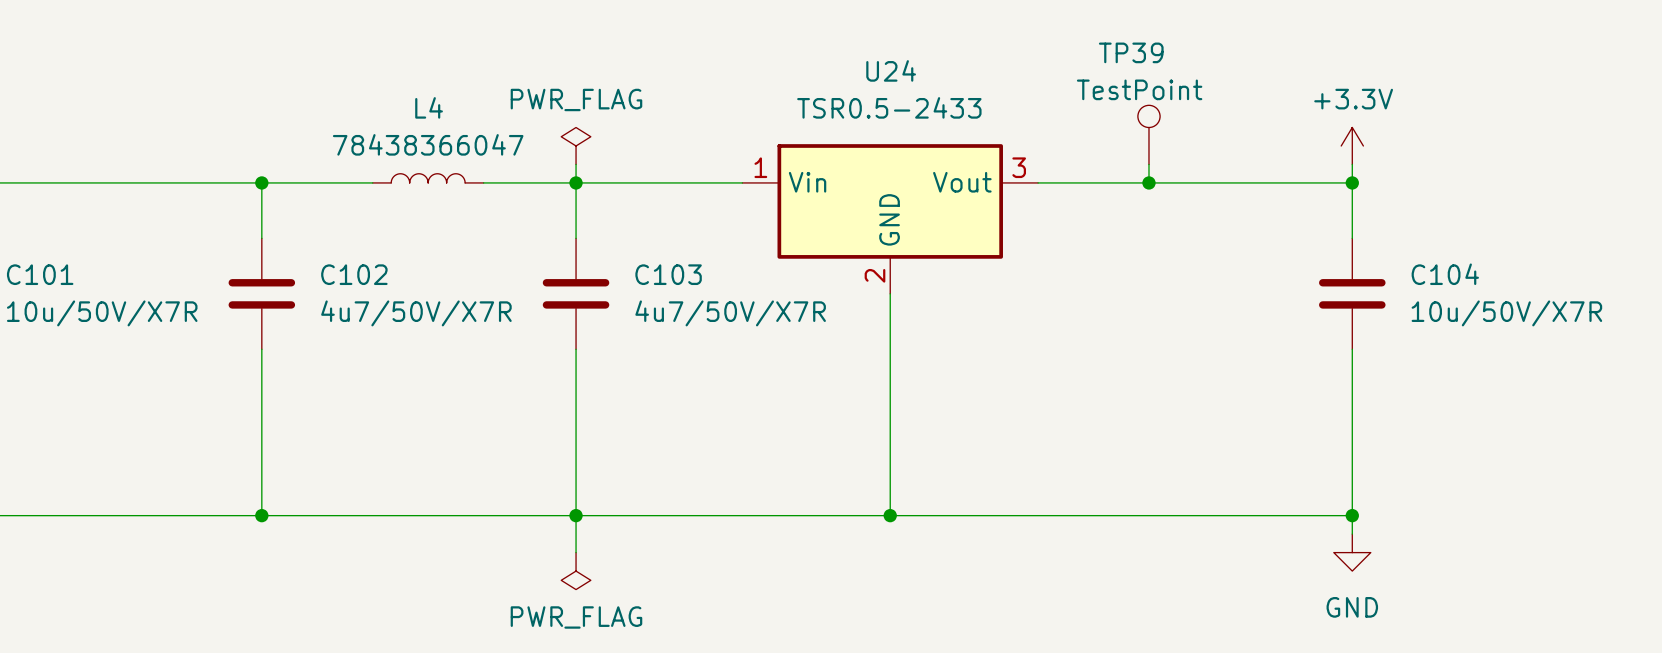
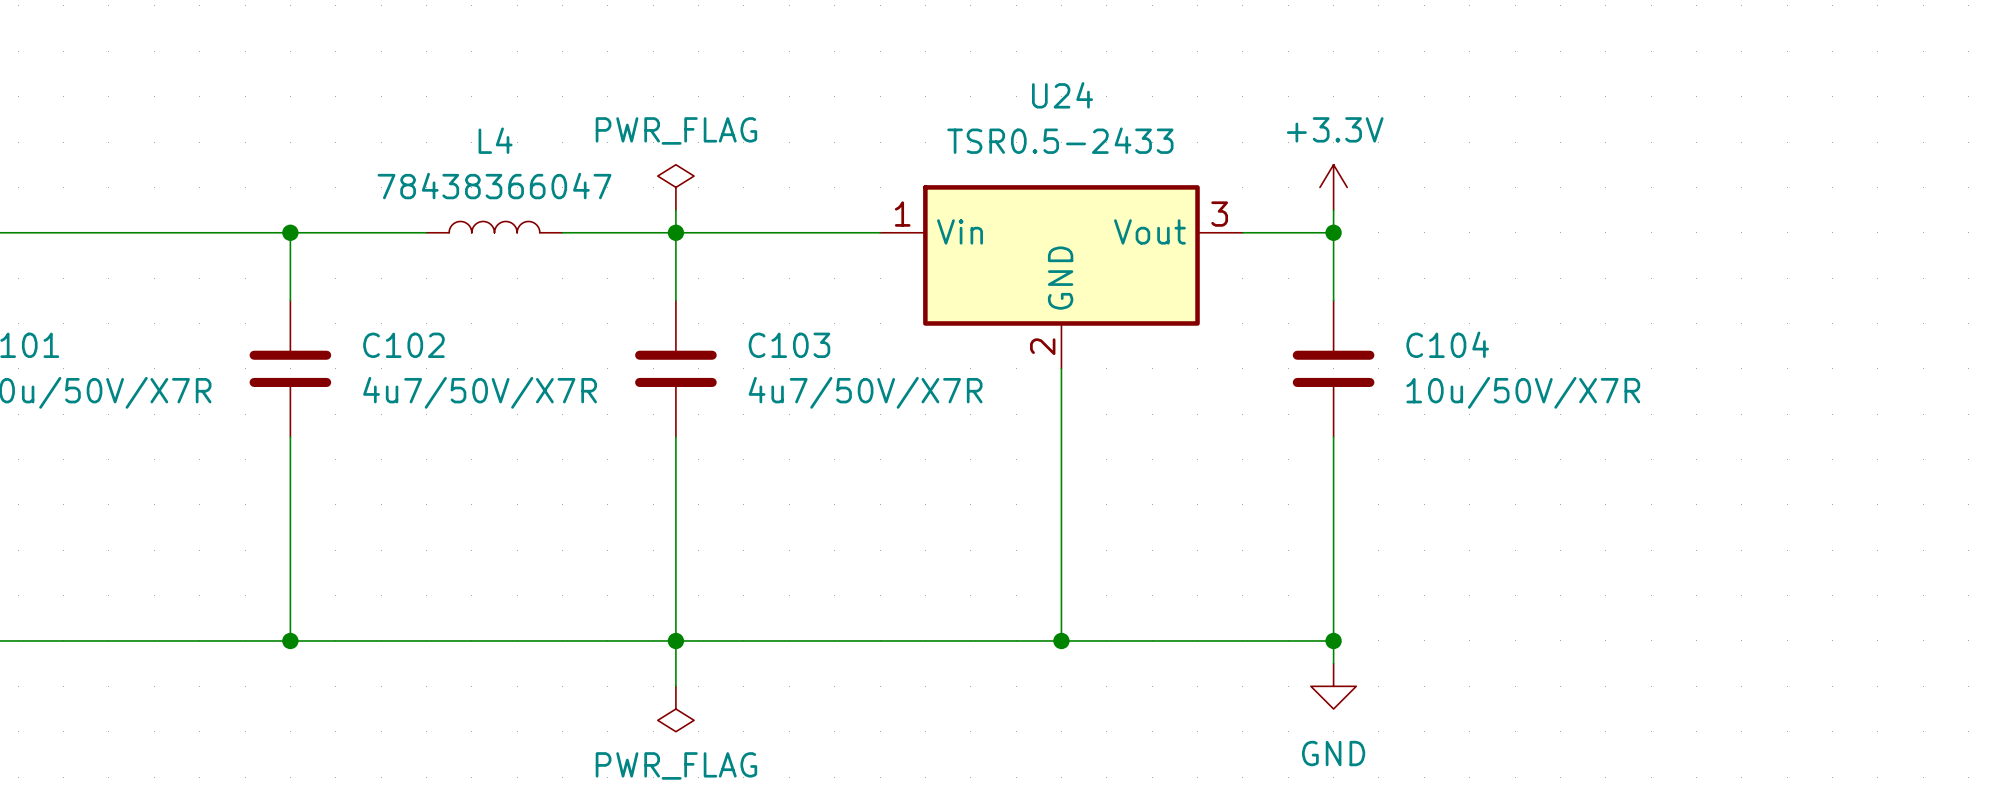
TP39: TestPoint (1148, 134) -> none
power symbol position: +3.3V (1352, 145) -> +3.3V (1333, 187)
wire: (1148, 164) (1148, 182) -> none
wire: (1352, 164) (1352, 238) -> (1333, 210) (1333, 300)
wire: (1112, 182) (1352, 182) -> none
junction position: (1148, 182) -> (1333, 232)
junction: (1352, 182) -> none
C104 position: (1352, 293) -> (1333, 368)
wire: (1352, 349) (1352, 534) -> (1333, 436) (1333, 663)
wire: (1112, 515) (1352, 515) -> none
junction: none -> (1333, 640)
junction: (1352, 515) -> none
power symbol position: GND (1352, 552) -> GND (1333, 686)

